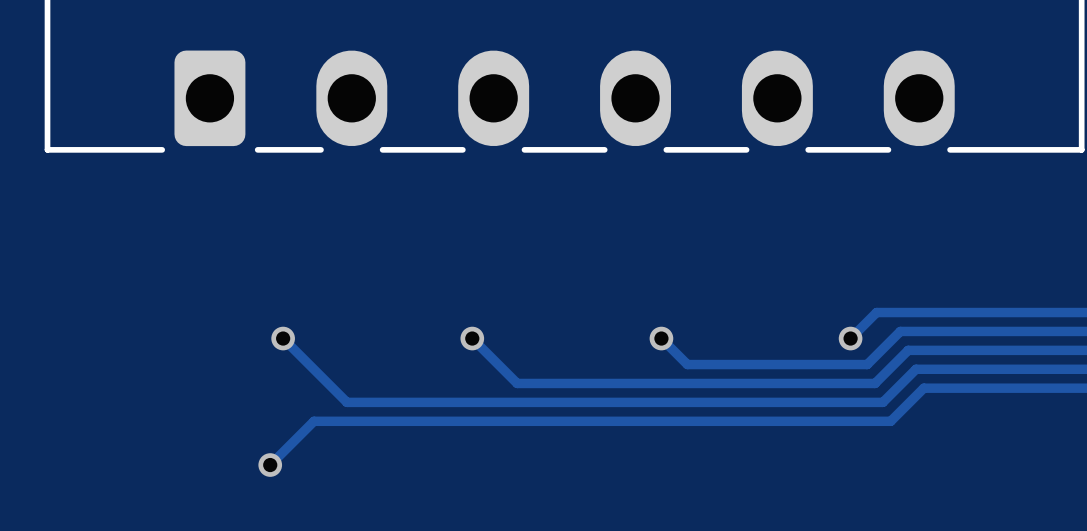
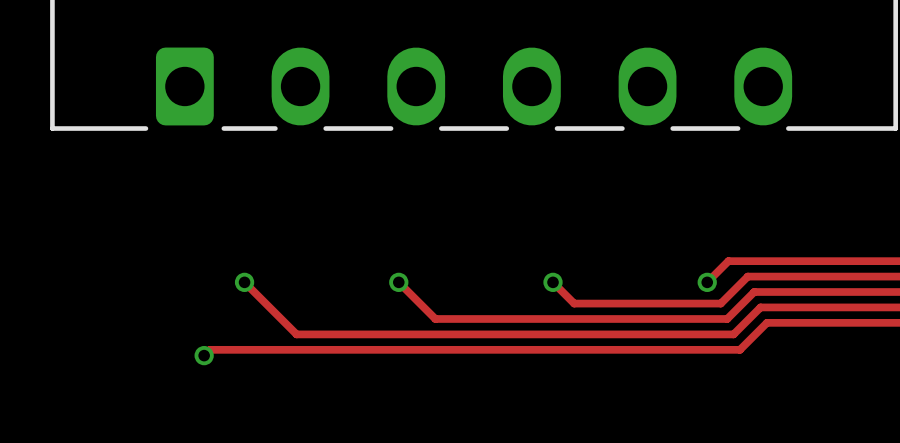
track: (313, 421) (270, 465) -> (269, 349) (209, 349) (204, 355)
via position: (270, 465) -> (204, 355)

